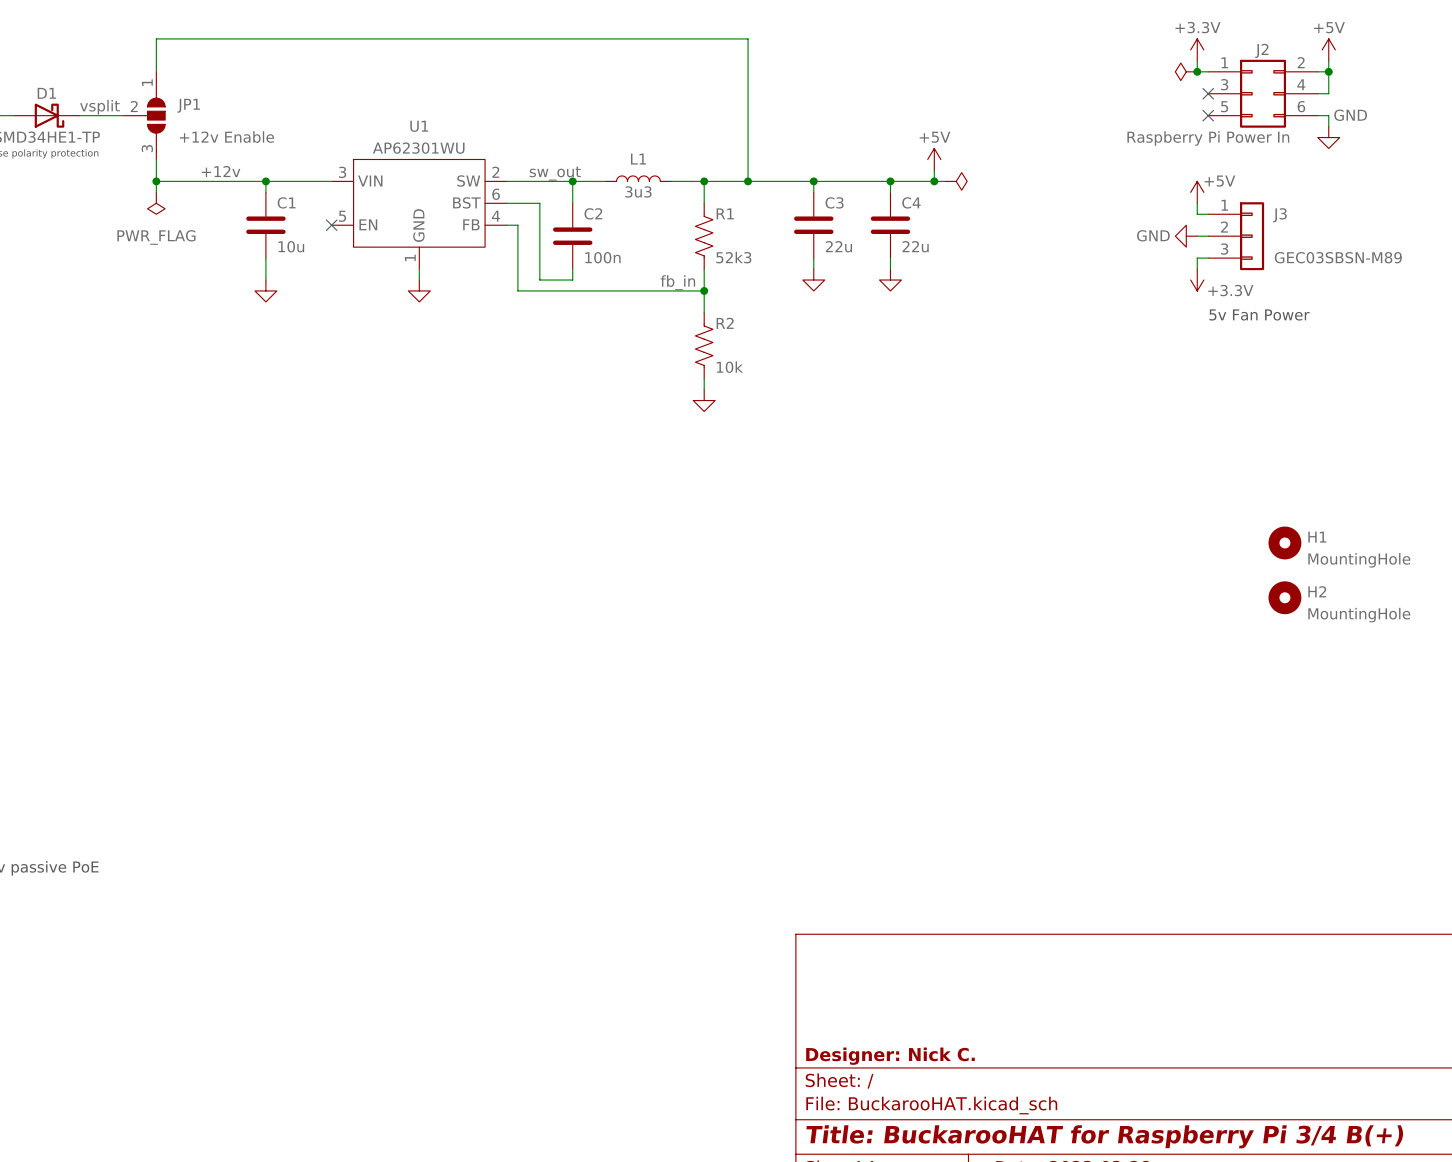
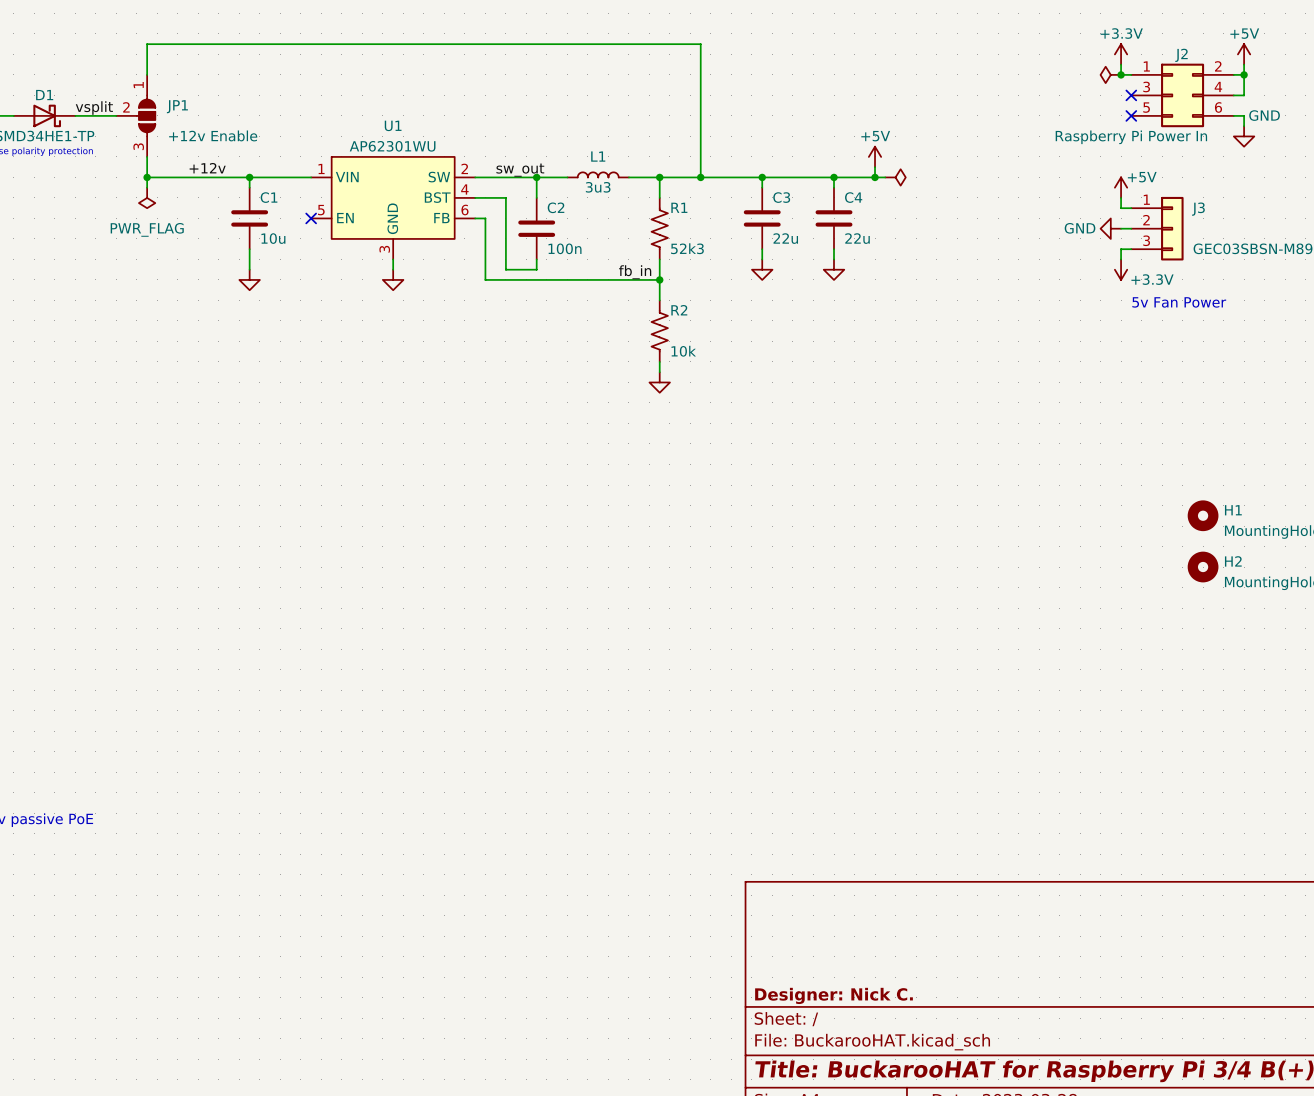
U1 pin number: 3 (342, 172) -> 1 (321, 168)
U1 pin number: 6 (496, 194) -> 4 (464, 189)
U1 pin number: 4 (495, 216) -> 6 (464, 210)
U1 pin number: 1 (410, 257) -> 3 (384, 249)

